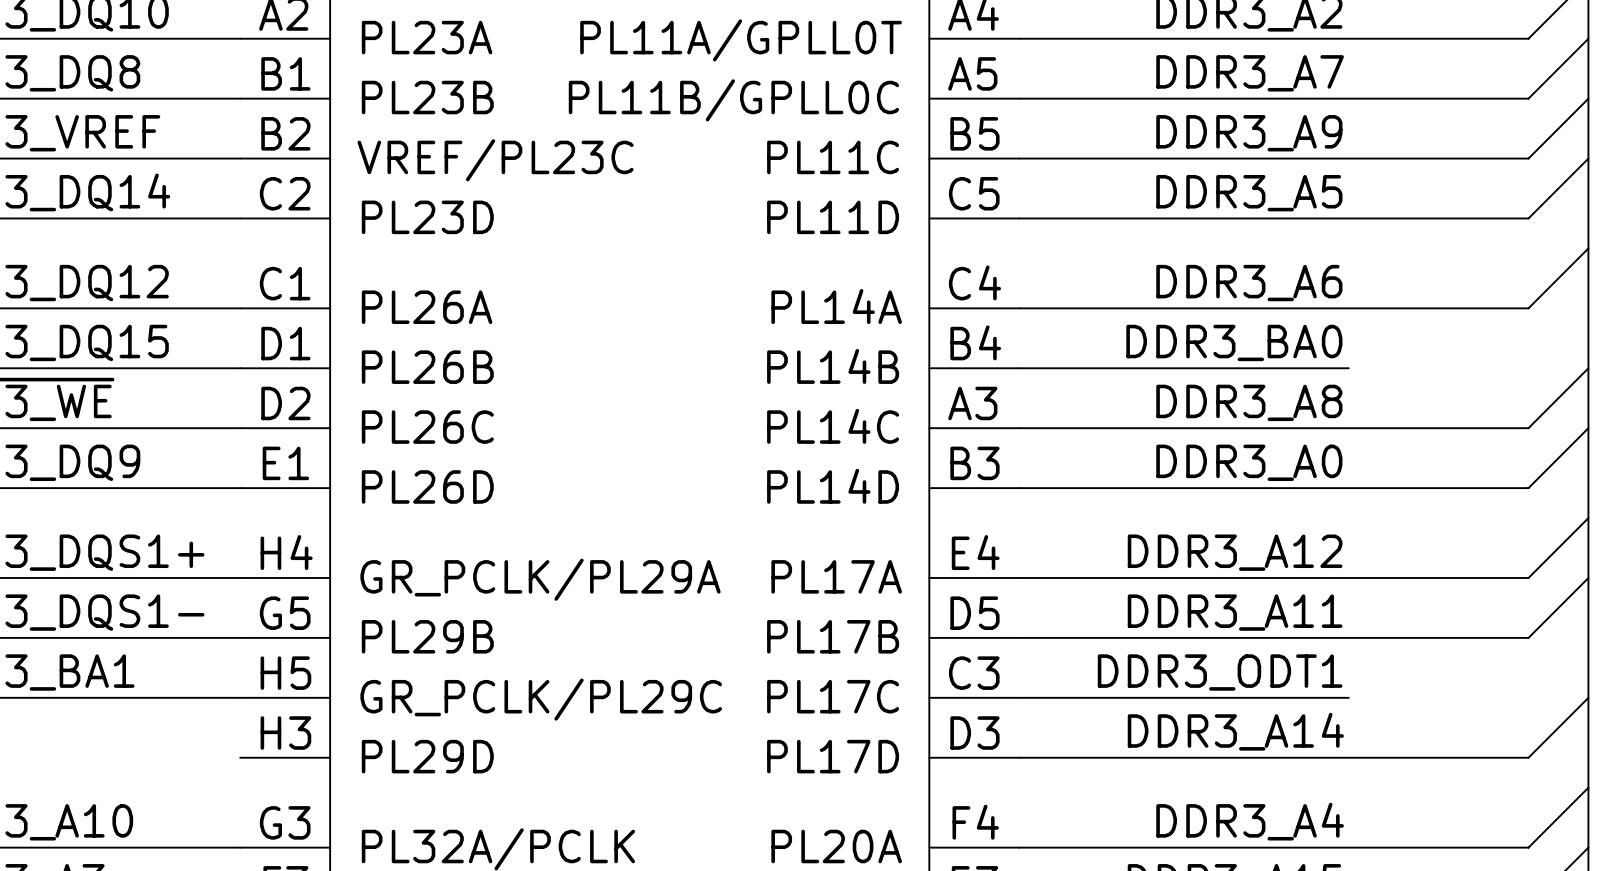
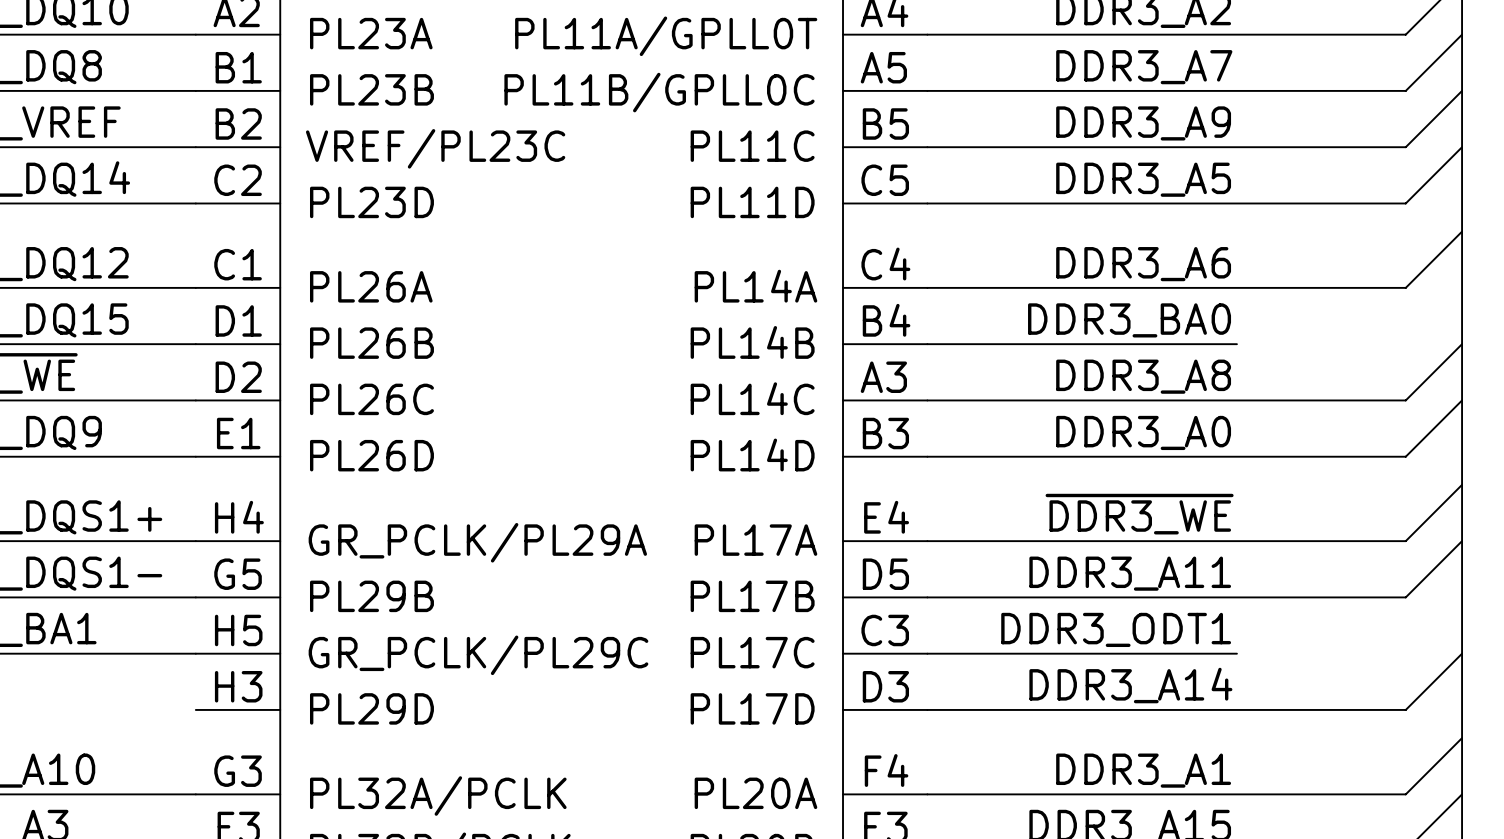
label: DDR3_A12 (1235, 552) -> ~{DDR3_WE} (1139, 514)
label: DDR3_A4 (1250, 821) -> DDR3_A1 (1143, 770)

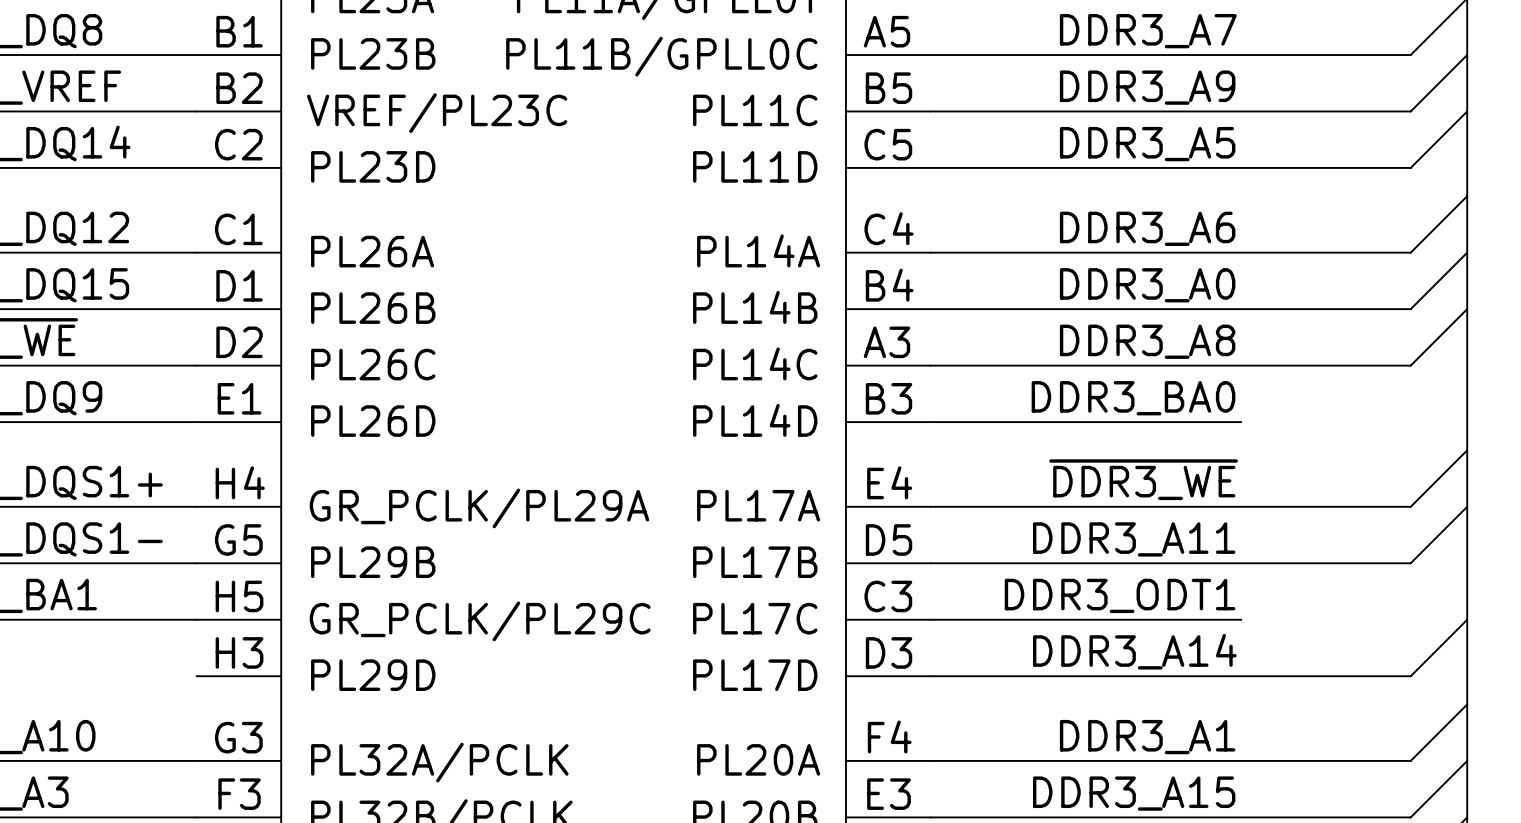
label: DDR3_BA0 (1129, 320) -> DDR3_A0 (1147, 285)
wire: (1462, 400) (1405, 456) (1236, 456) -> (1467, 252) (1410, 309) (1241, 309)
label: DDR3_A0 (1143, 432) -> DDR3_BA0 (1133, 398)

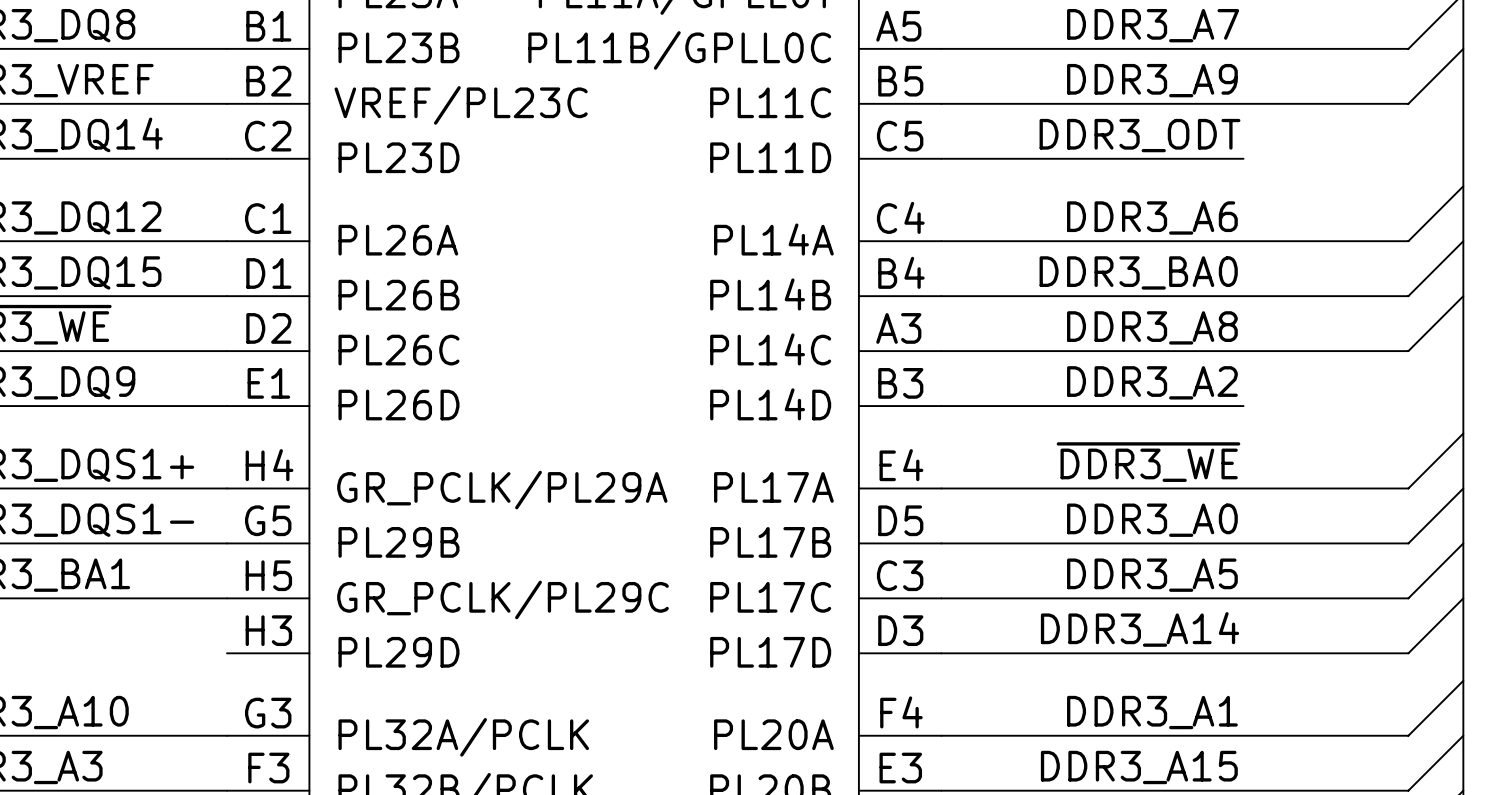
wire: (1467, 111) (1410, 167) (1241, 167) -> (1463, 543) (1408, 598) (1243, 598)
label: DDR3_A5 (1147, 144) -> DDR3_ODT (1139, 135)
label: DDR3_A0 (1147, 285) -> DDR3_BA0 (1138, 272)
label: DDR3_BA0 (1133, 398) -> DDR3_A2 (1152, 382)
label: DDR3_A11 (1134, 539) -> DDR3_A0 (1152, 520)
label: DDR3_ODT1 (1120, 595) -> DDR3_A5 (1152, 575)

